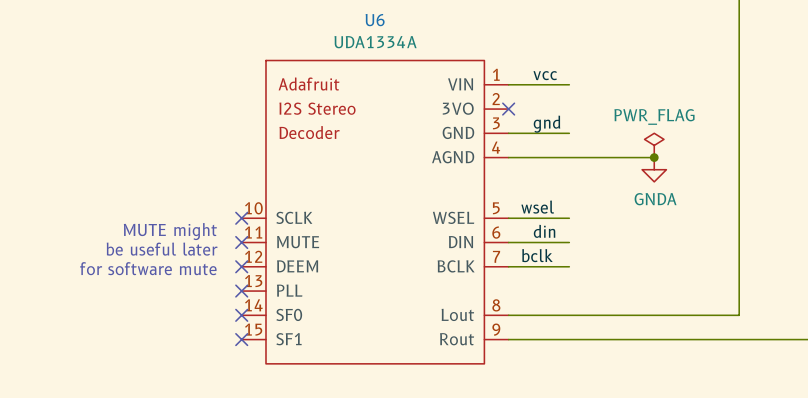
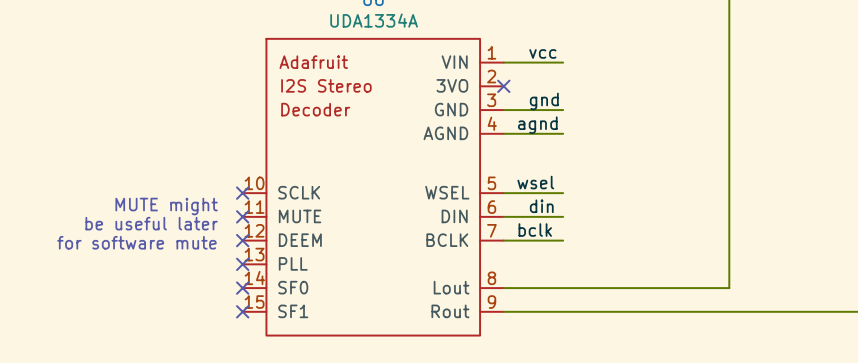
power symbol: PWR_FLAG (654, 145) -> none
label: none -> agnd (537, 125)
wire: (569, 157) (654, 157) -> none
junction: (654, 157) -> none
power symbol: GNDA (654, 169) -> none

